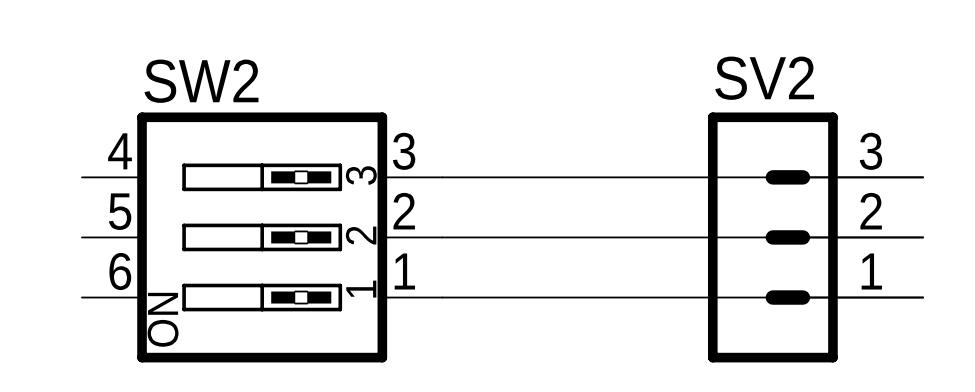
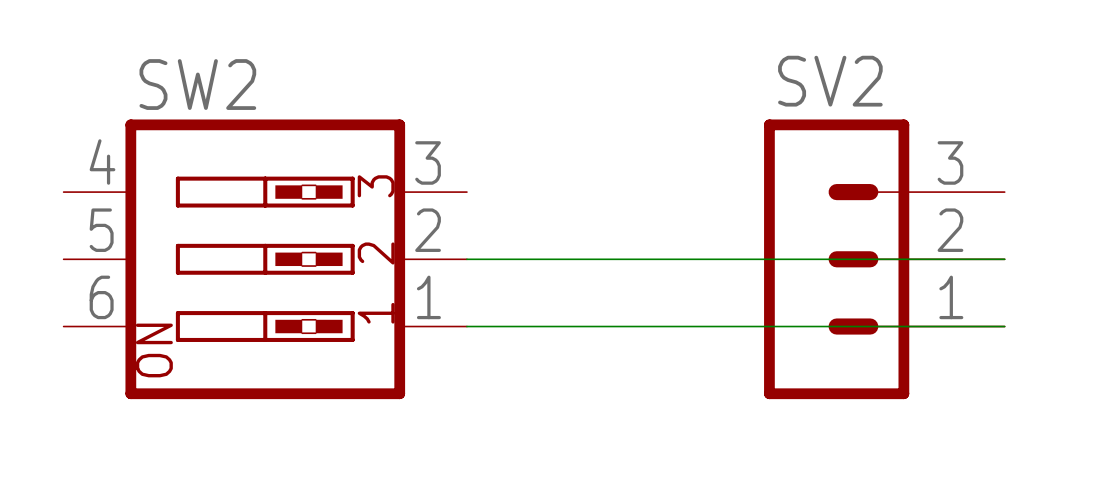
wire: (442, 177) (923, 177) -> none

